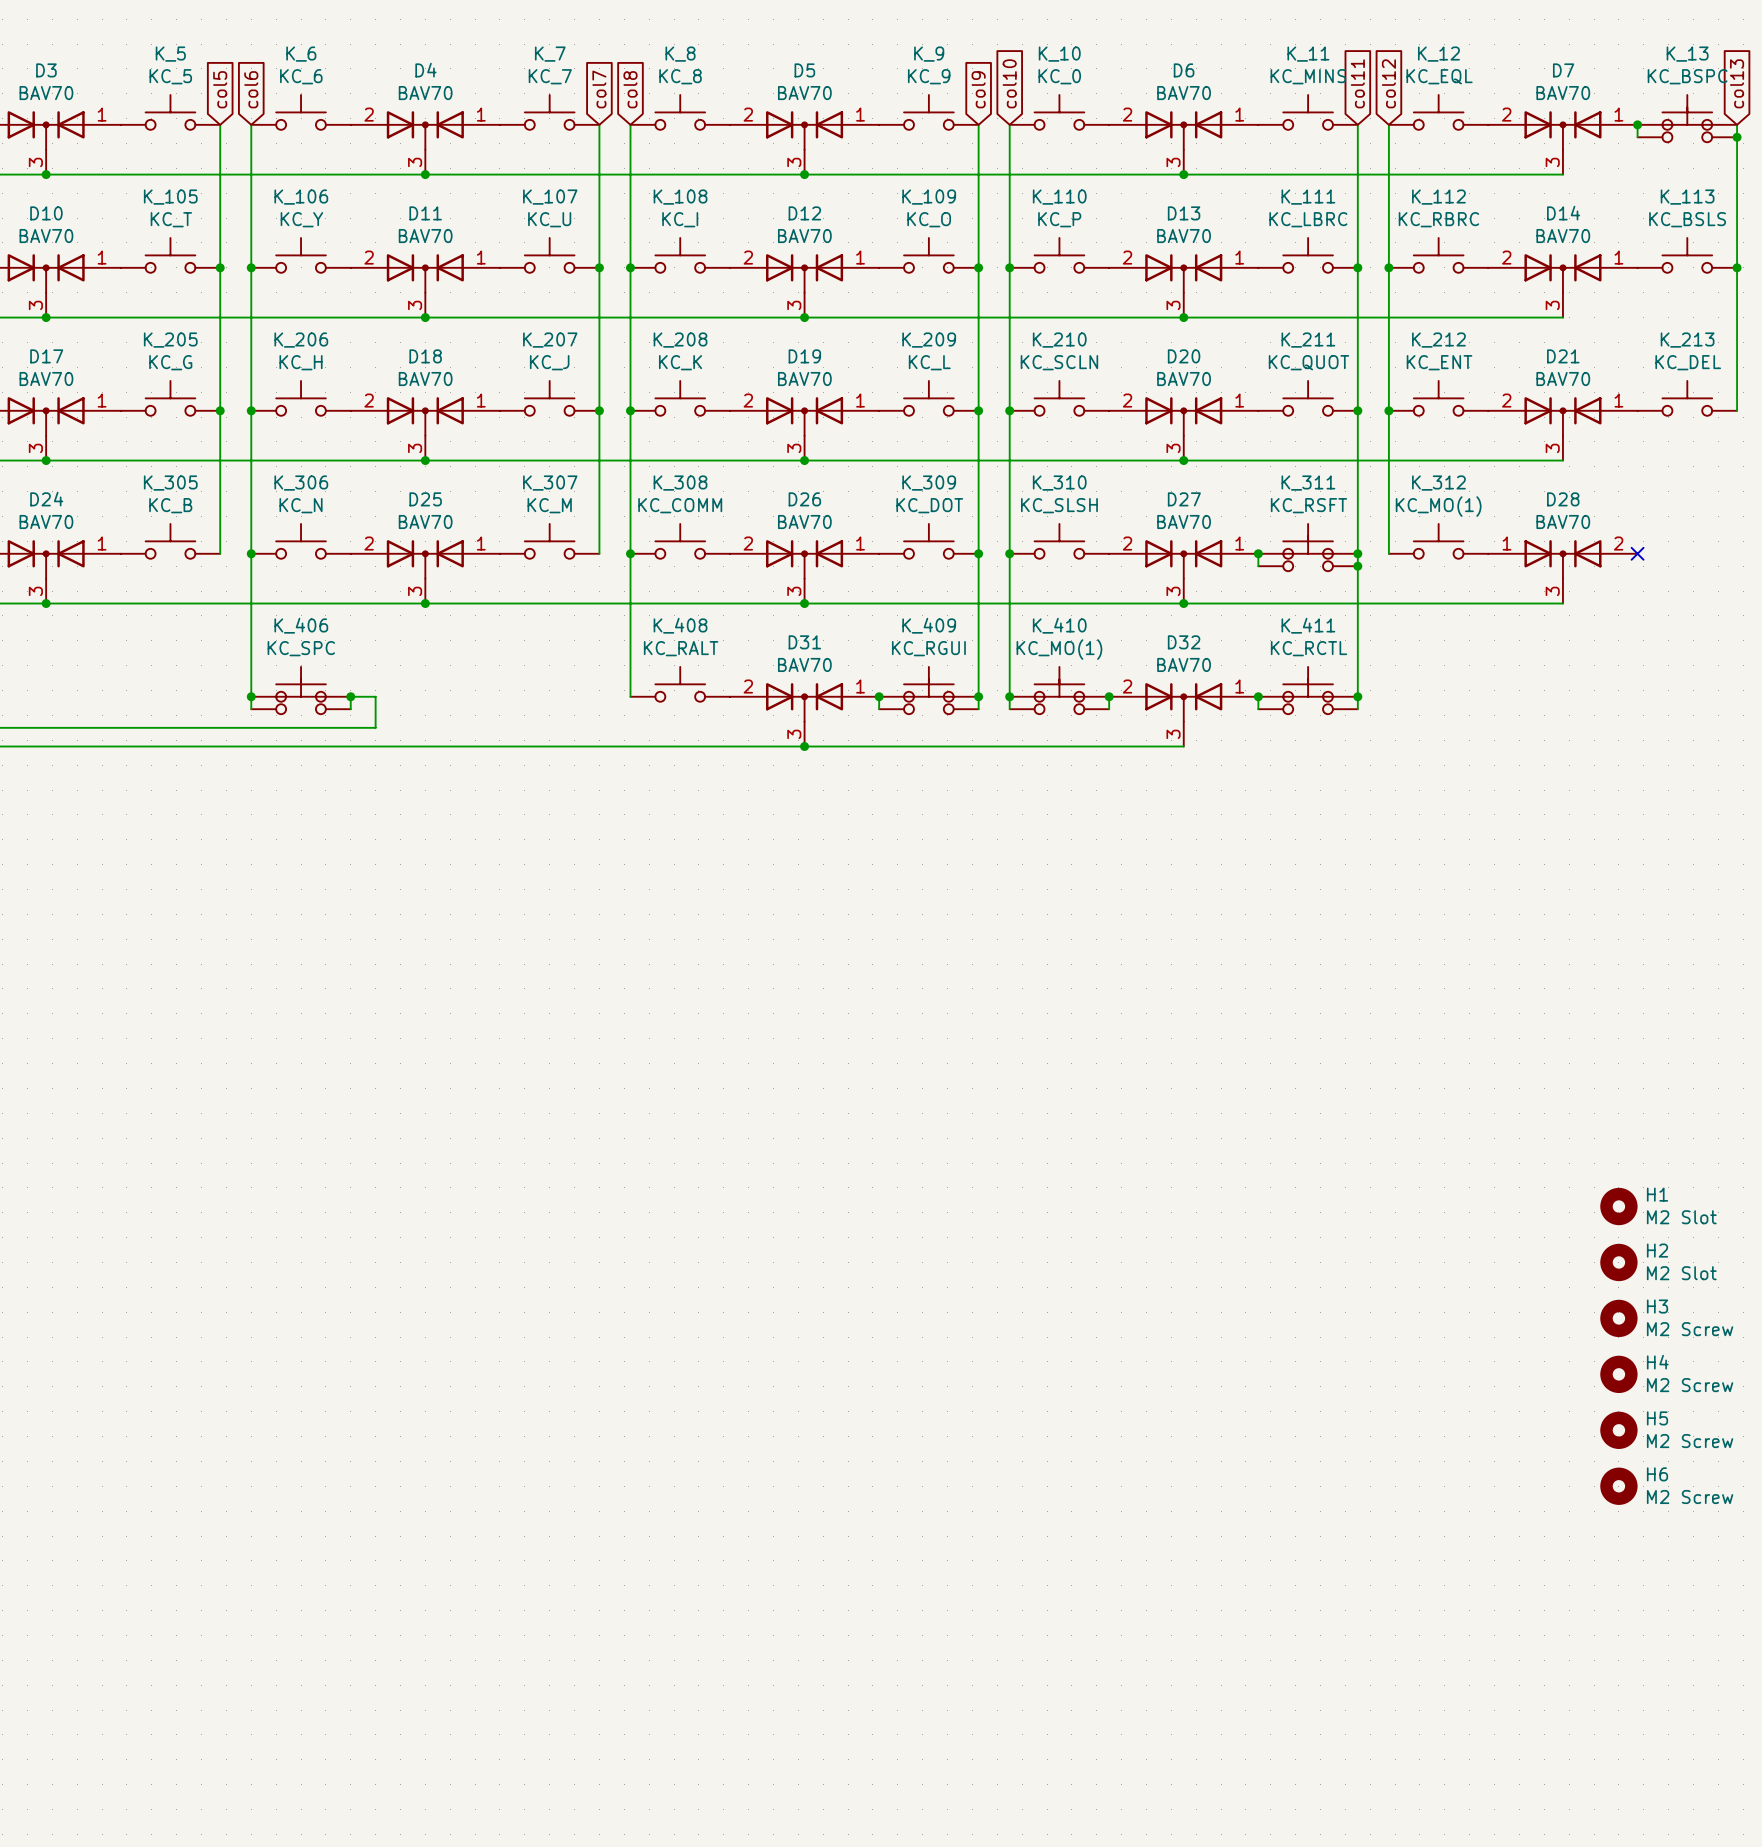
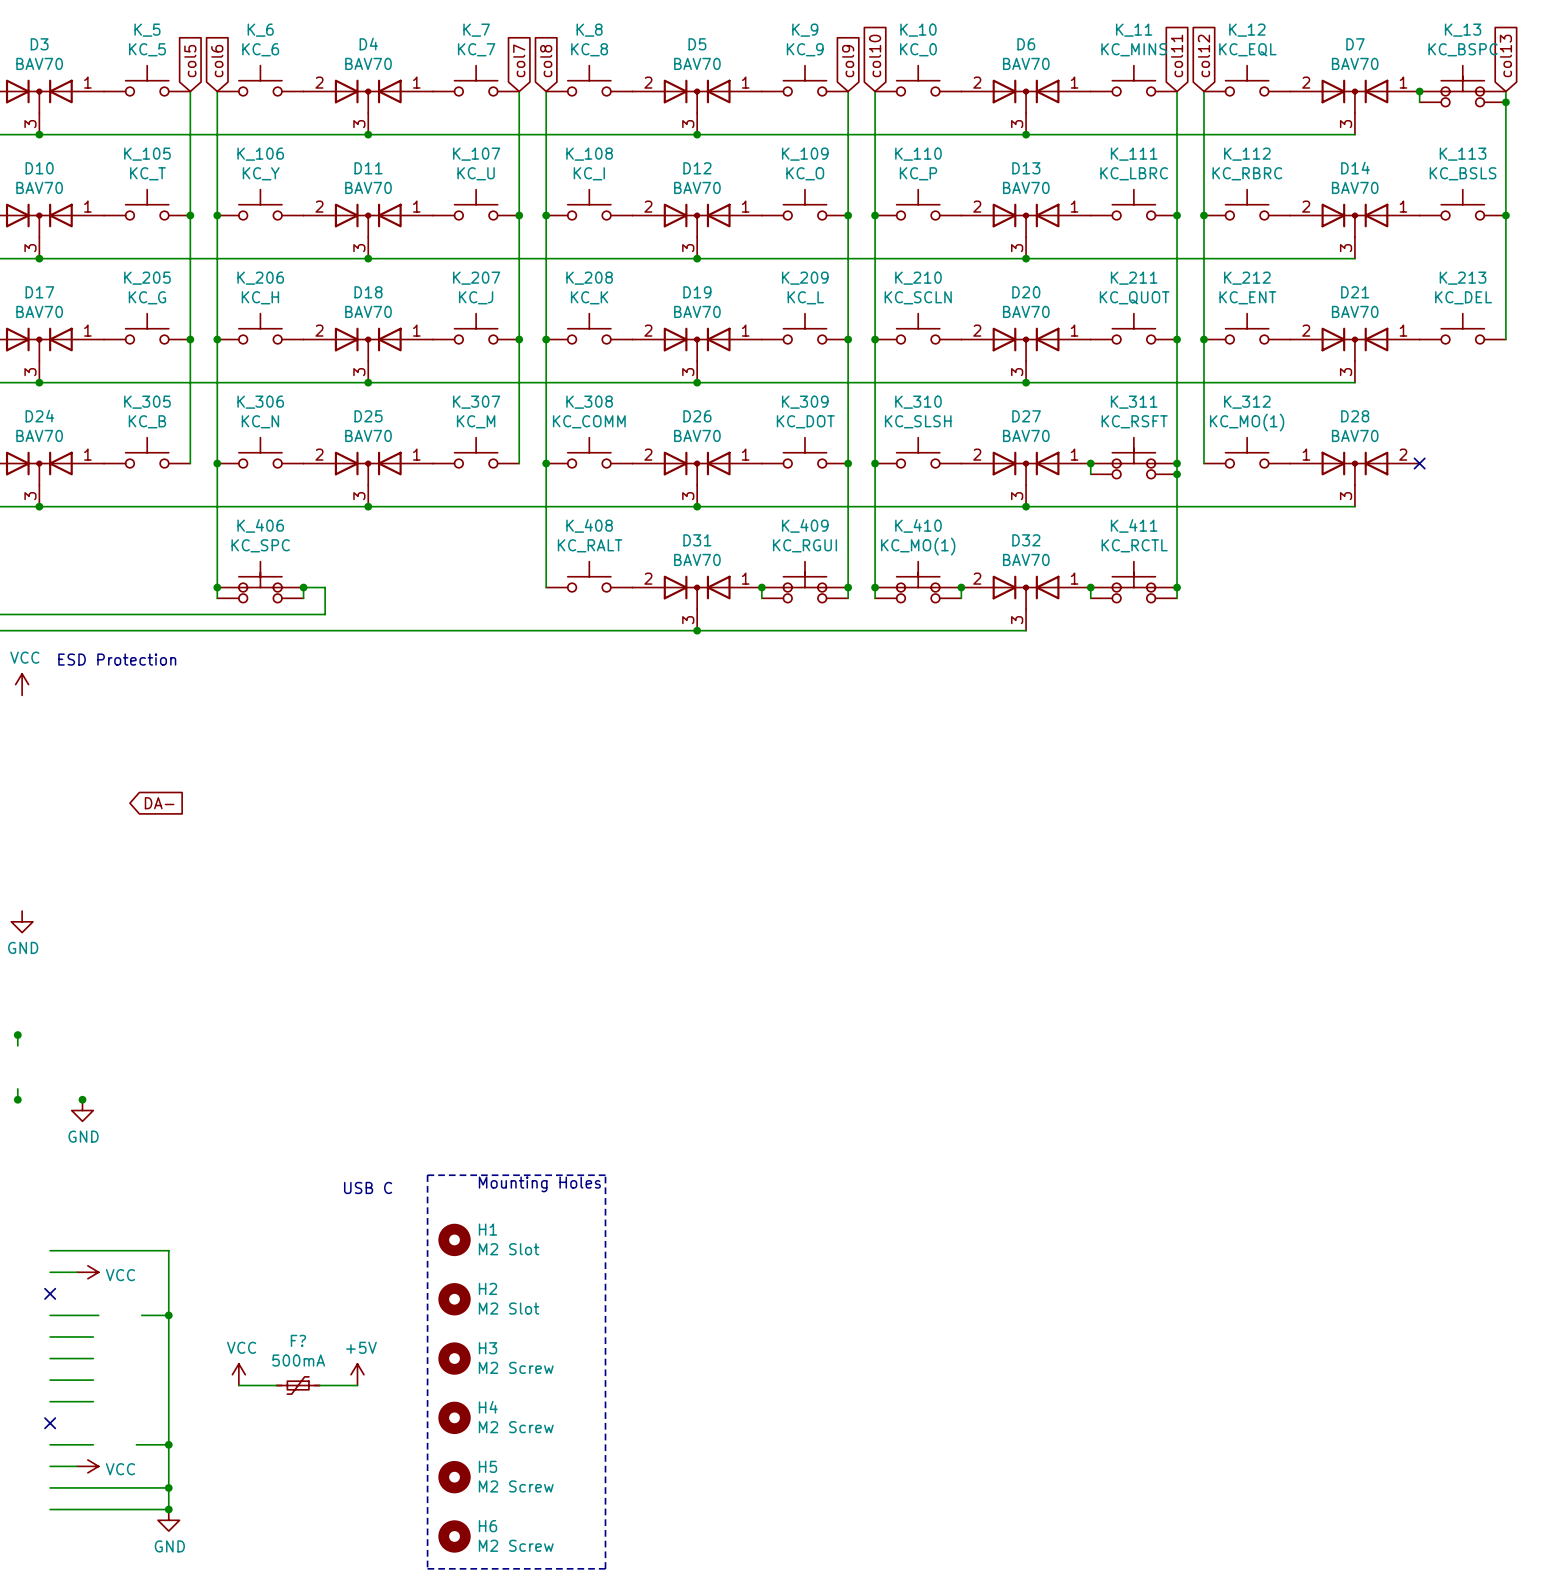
text: none -> ESD Protection (117, 659)
power symbol: none -> VCC (22, 684)
global label: none -> DA- (159, 803)
power symbol: none -> GND (22, 921)
H1 position: (1618, 1206) -> (454, 1239)
wire: none -> (17, 1035) (17, 1045)
junction: none -> (17, 1035)
H2 position: (1618, 1262) -> (454, 1299)
wire: none -> (17, 1088) (17, 1099)
junction: none -> (17, 1099)
junction: none -> (82, 1099)
power symbol: none -> GND (82, 1110)
H3 position: (1618, 1318) -> (454, 1358)
line: none -> (427, 1175) (427, 1568) (605, 1568) (605, 1175) (427, 1175)
H4 position: (1618, 1374) -> (454, 1417)
text: none -> Mounting Holes (539, 1184)
text: none -> USB C (368, 1187)
H5 position: (1618, 1430) -> (454, 1477)
wire: none -> (50, 1250) (168, 1250) (168, 1509) (50, 1509)
wire: none -> (50, 1272) (77, 1272)
power symbol: none -> VCC (87, 1272)
H6 position: (1618, 1486) -> (454, 1536)
no-connect mark: none -> (50, 1293)
wire: none -> (50, 1315) (98, 1315)
wire: none -> (141, 1315) (168, 1315)
junction: none -> (168, 1315)
wire: none -> (50, 1336) (93, 1336)
wire: none -> (50, 1358) (93, 1358)
power symbol: none -> VCC (238, 1374)
power symbol: none -> +5V (357, 1374)
wire: none -> (50, 1380) (93, 1380)
wire: none -> (238, 1385) (276, 1385)
F?: none -> 500mA (298, 1385)
wire: none -> (319, 1385) (357, 1385)
wire: none -> (50, 1401) (93, 1401)
no-connect mark: none -> (50, 1423)
wire: none -> (50, 1444) (93, 1444)
wire: none -> (136, 1444) (168, 1444)
junction: none -> (168, 1444)
wire: none -> (50, 1466) (77, 1466)
power symbol: none -> VCC (87, 1466)
wire: none -> (50, 1487) (168, 1487)
junction: none -> (168, 1487)
junction: none -> (168, 1509)
power symbol: none -> GND (168, 1520)

